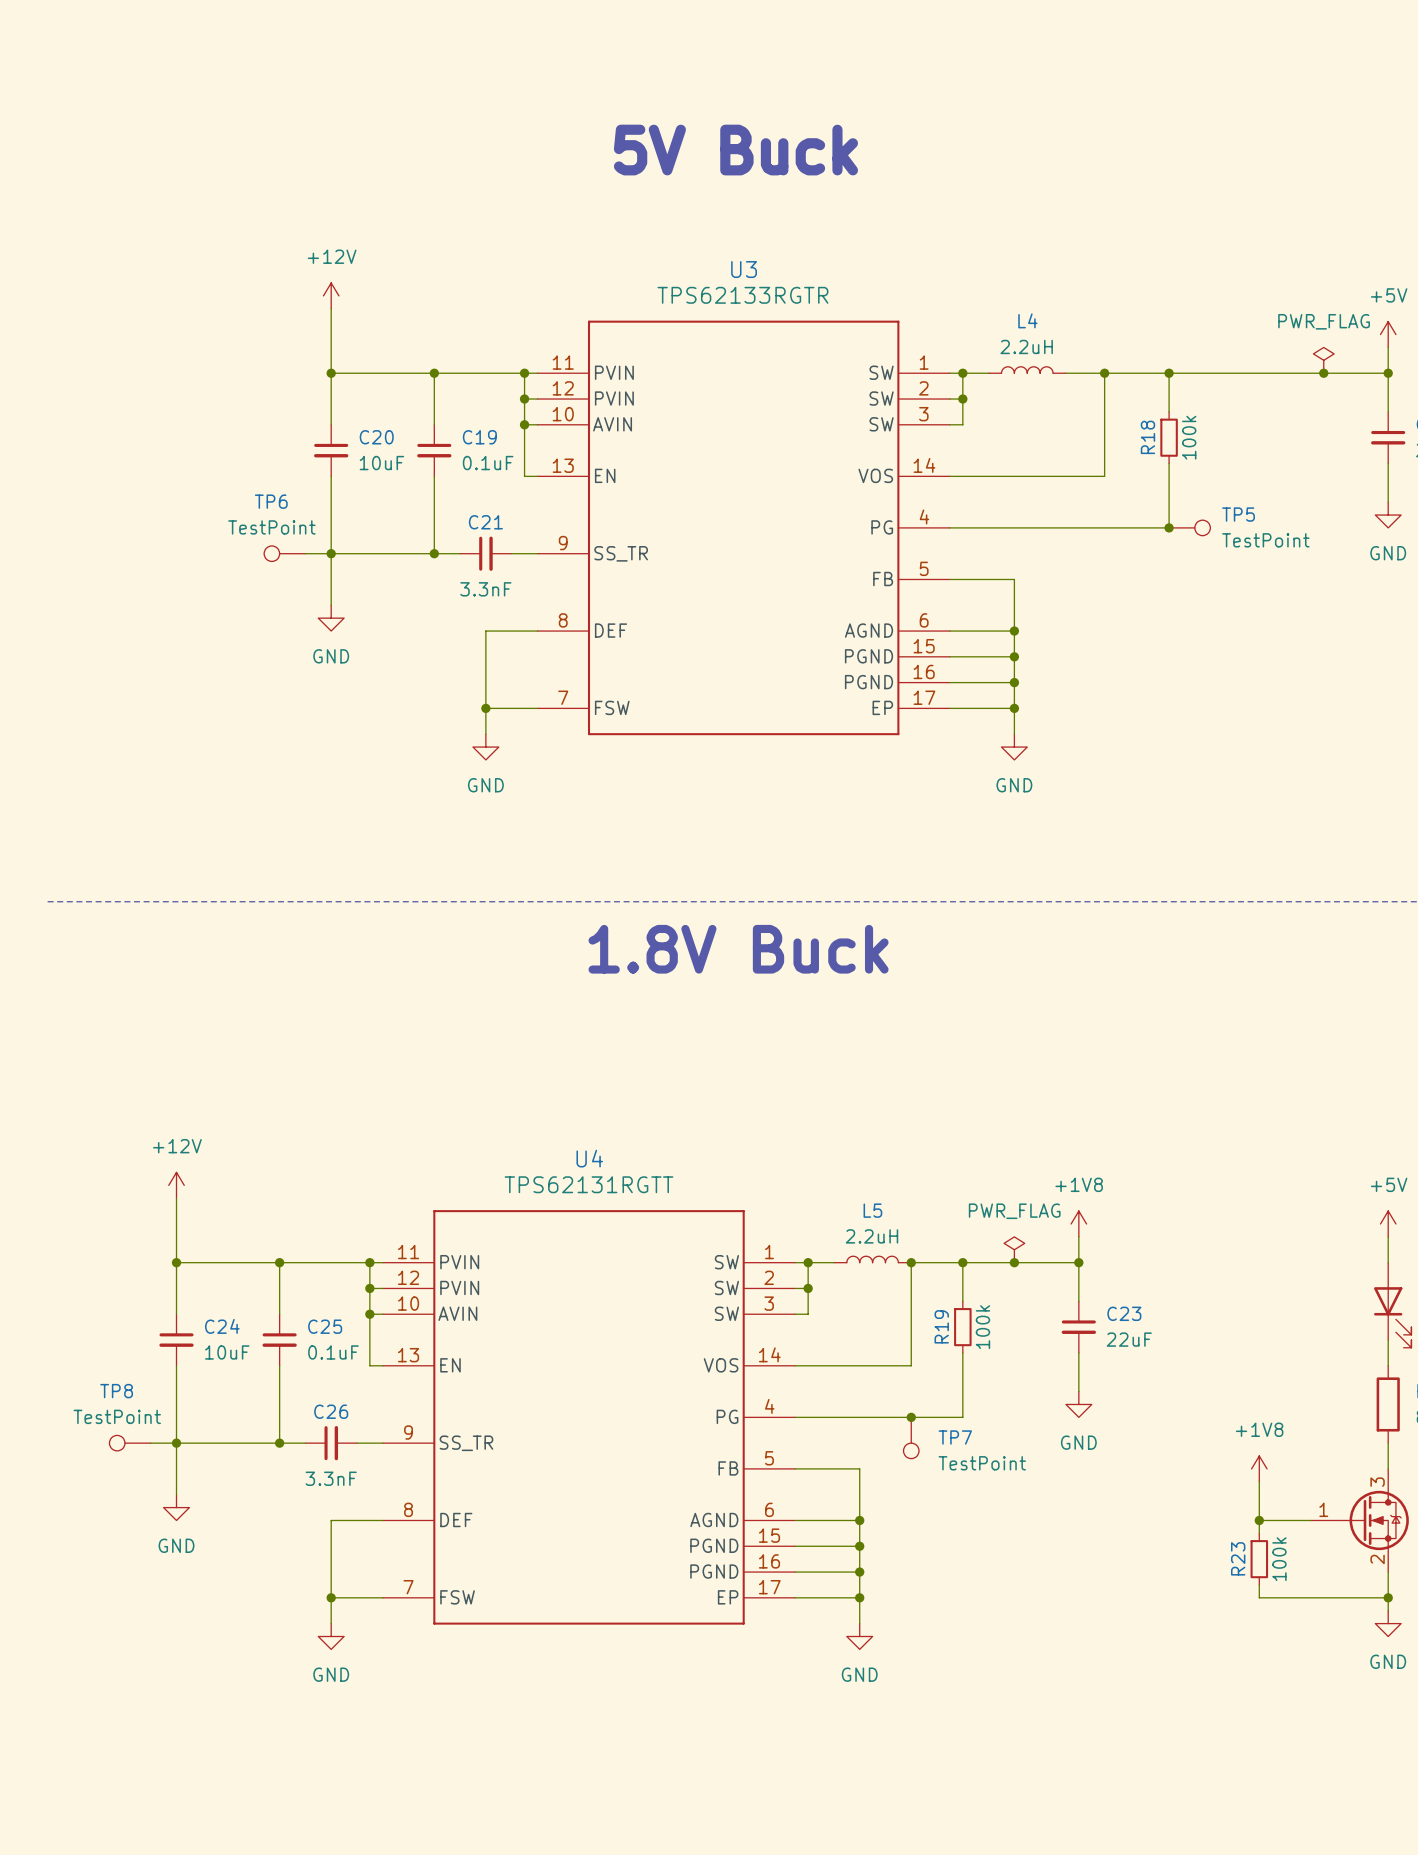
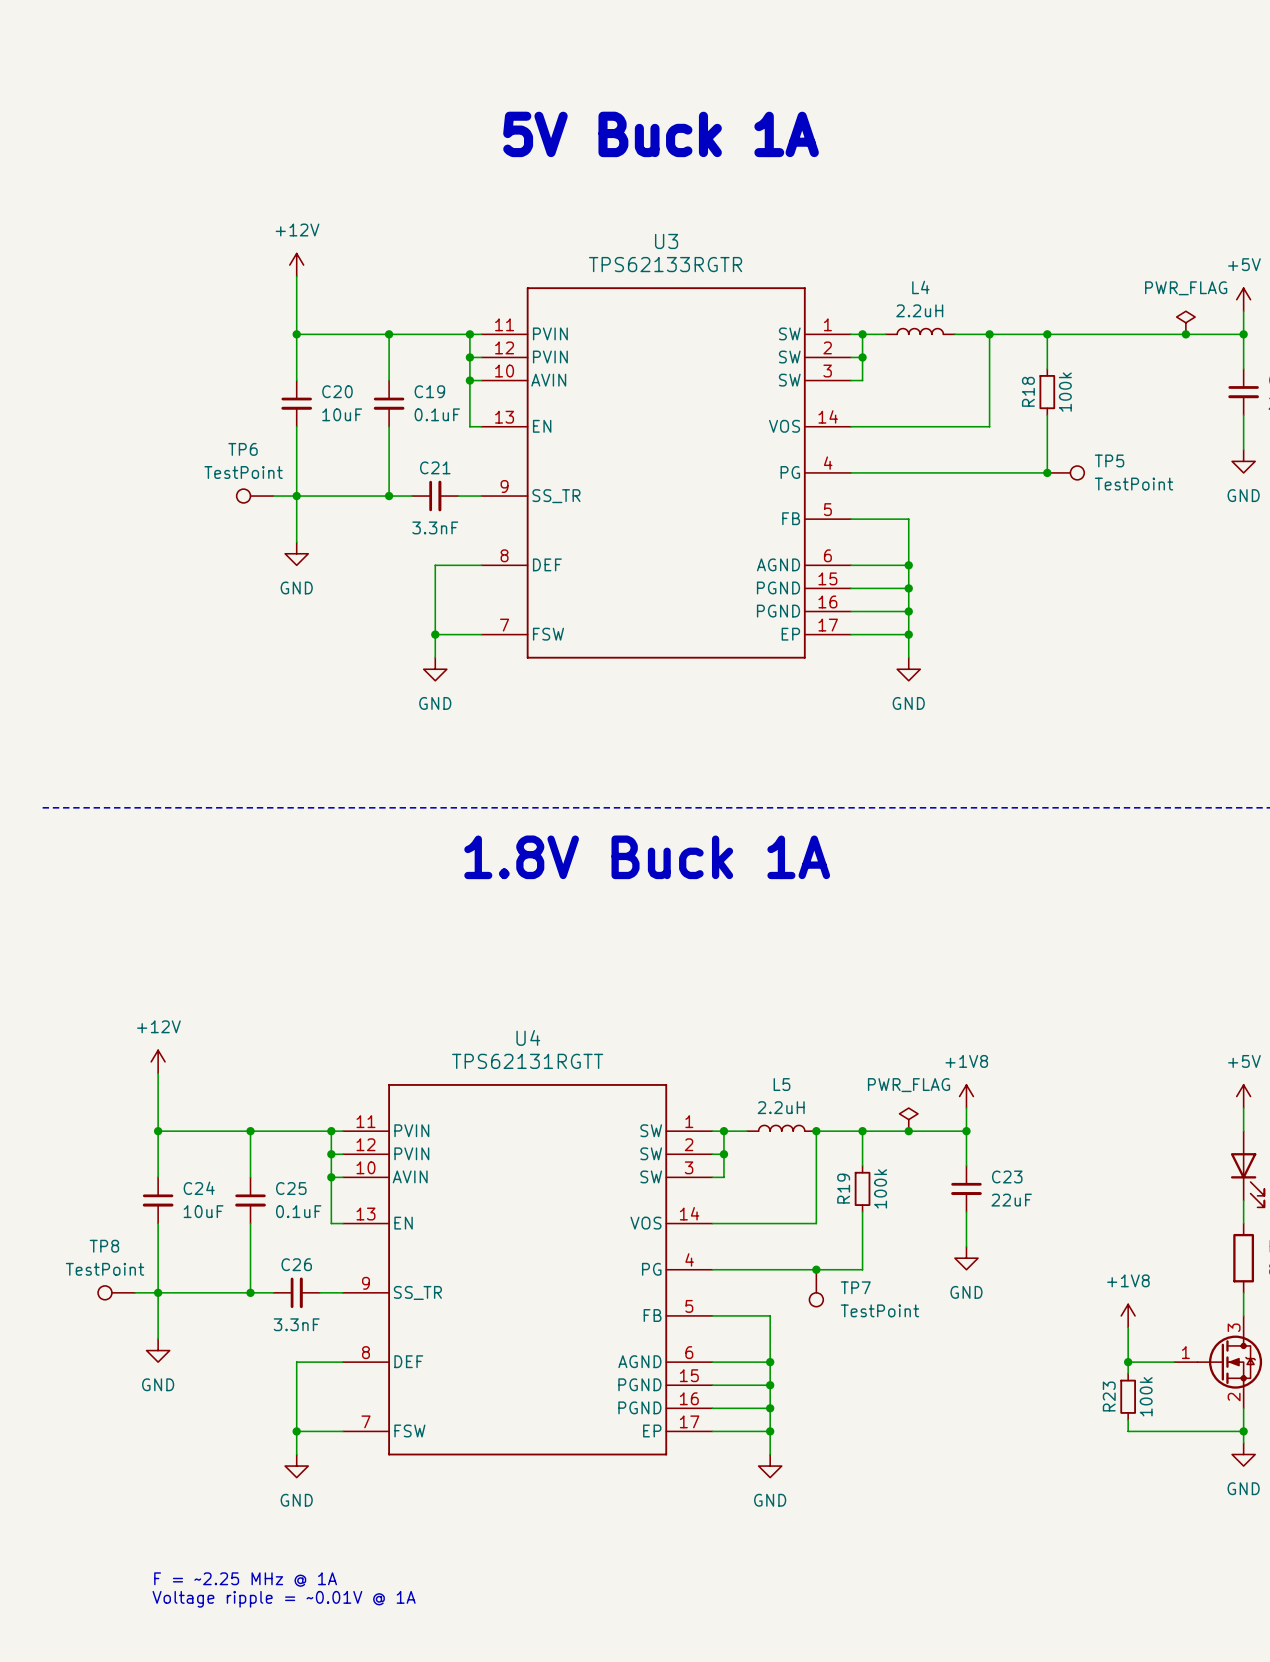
text: 5V Buck (735, 150) -> 5V Buck 1A (661, 134)
text: 1.8V Buck (738, 949) -> 1.8V Buck 1A (647, 857)
text: none -> F = ~2.25 MHz @ 1A (245, 1579)
text: none -> Voltage ripple = ~0.01V @ 1A (284, 1599)

